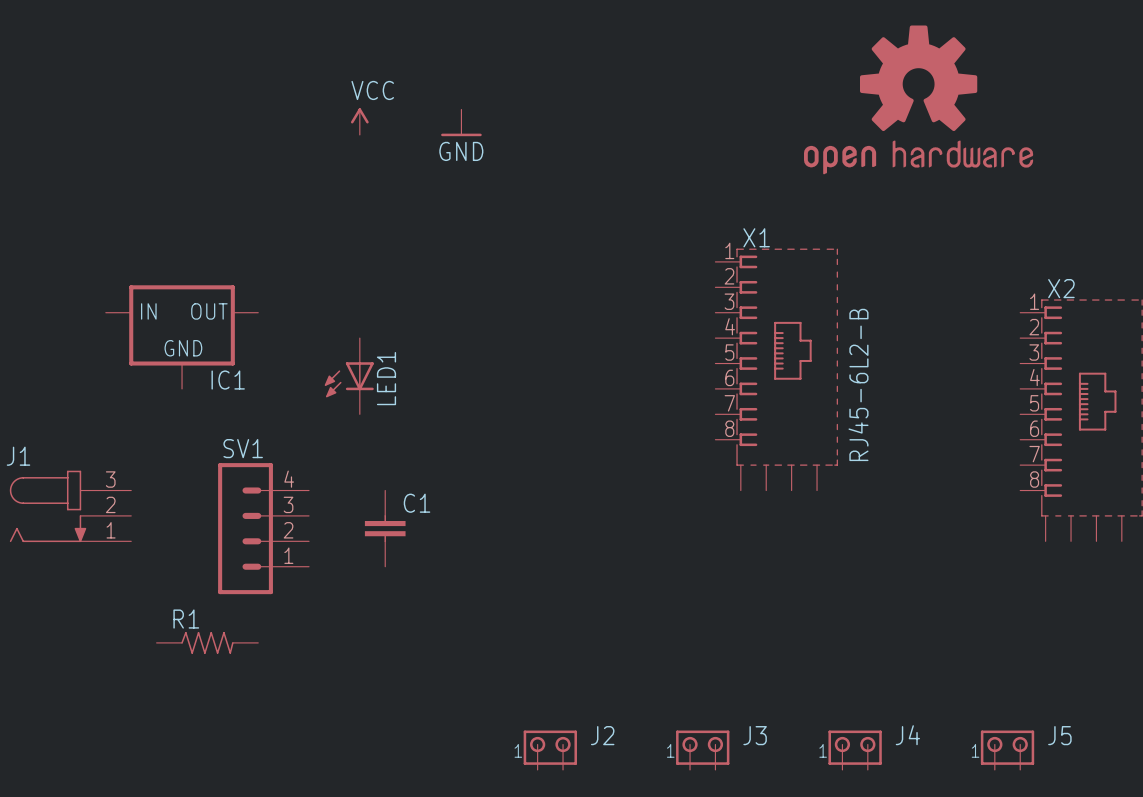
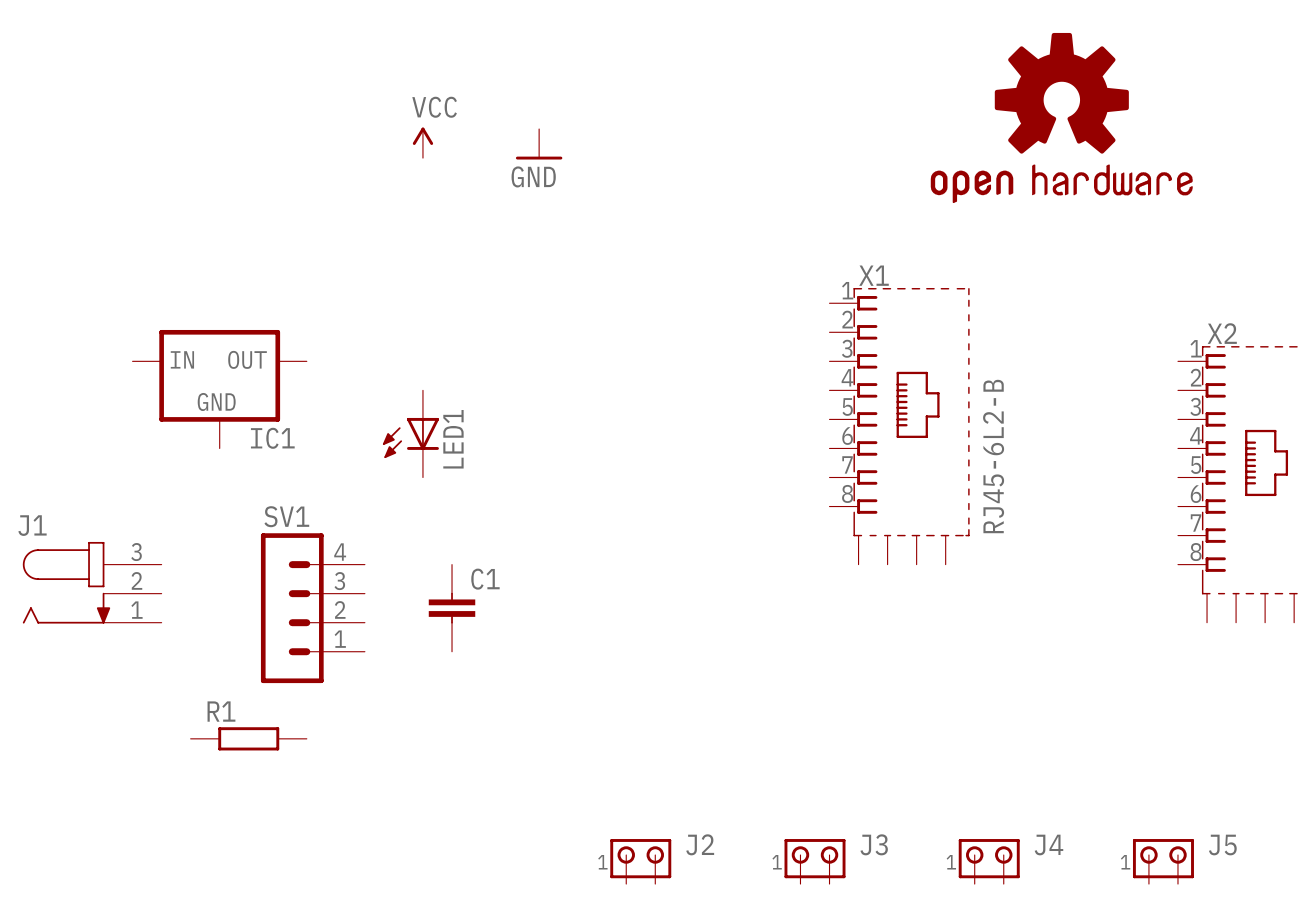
R1 symbol: [156, 631, 259, 654] -> [190, 727, 307, 751]

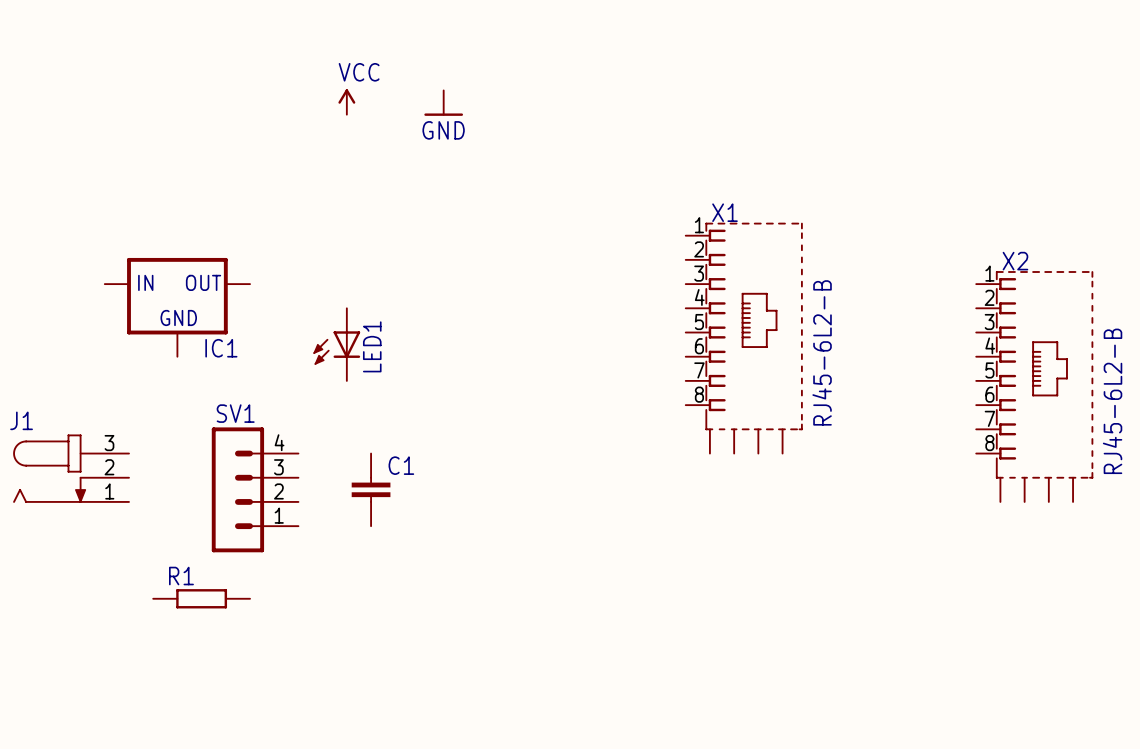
part: (1061, 117) -> none
J2: (640, 861) -> none
J3: (815, 861) -> none
J4: (989, 861) -> none
J5: (1163, 861) -> none

